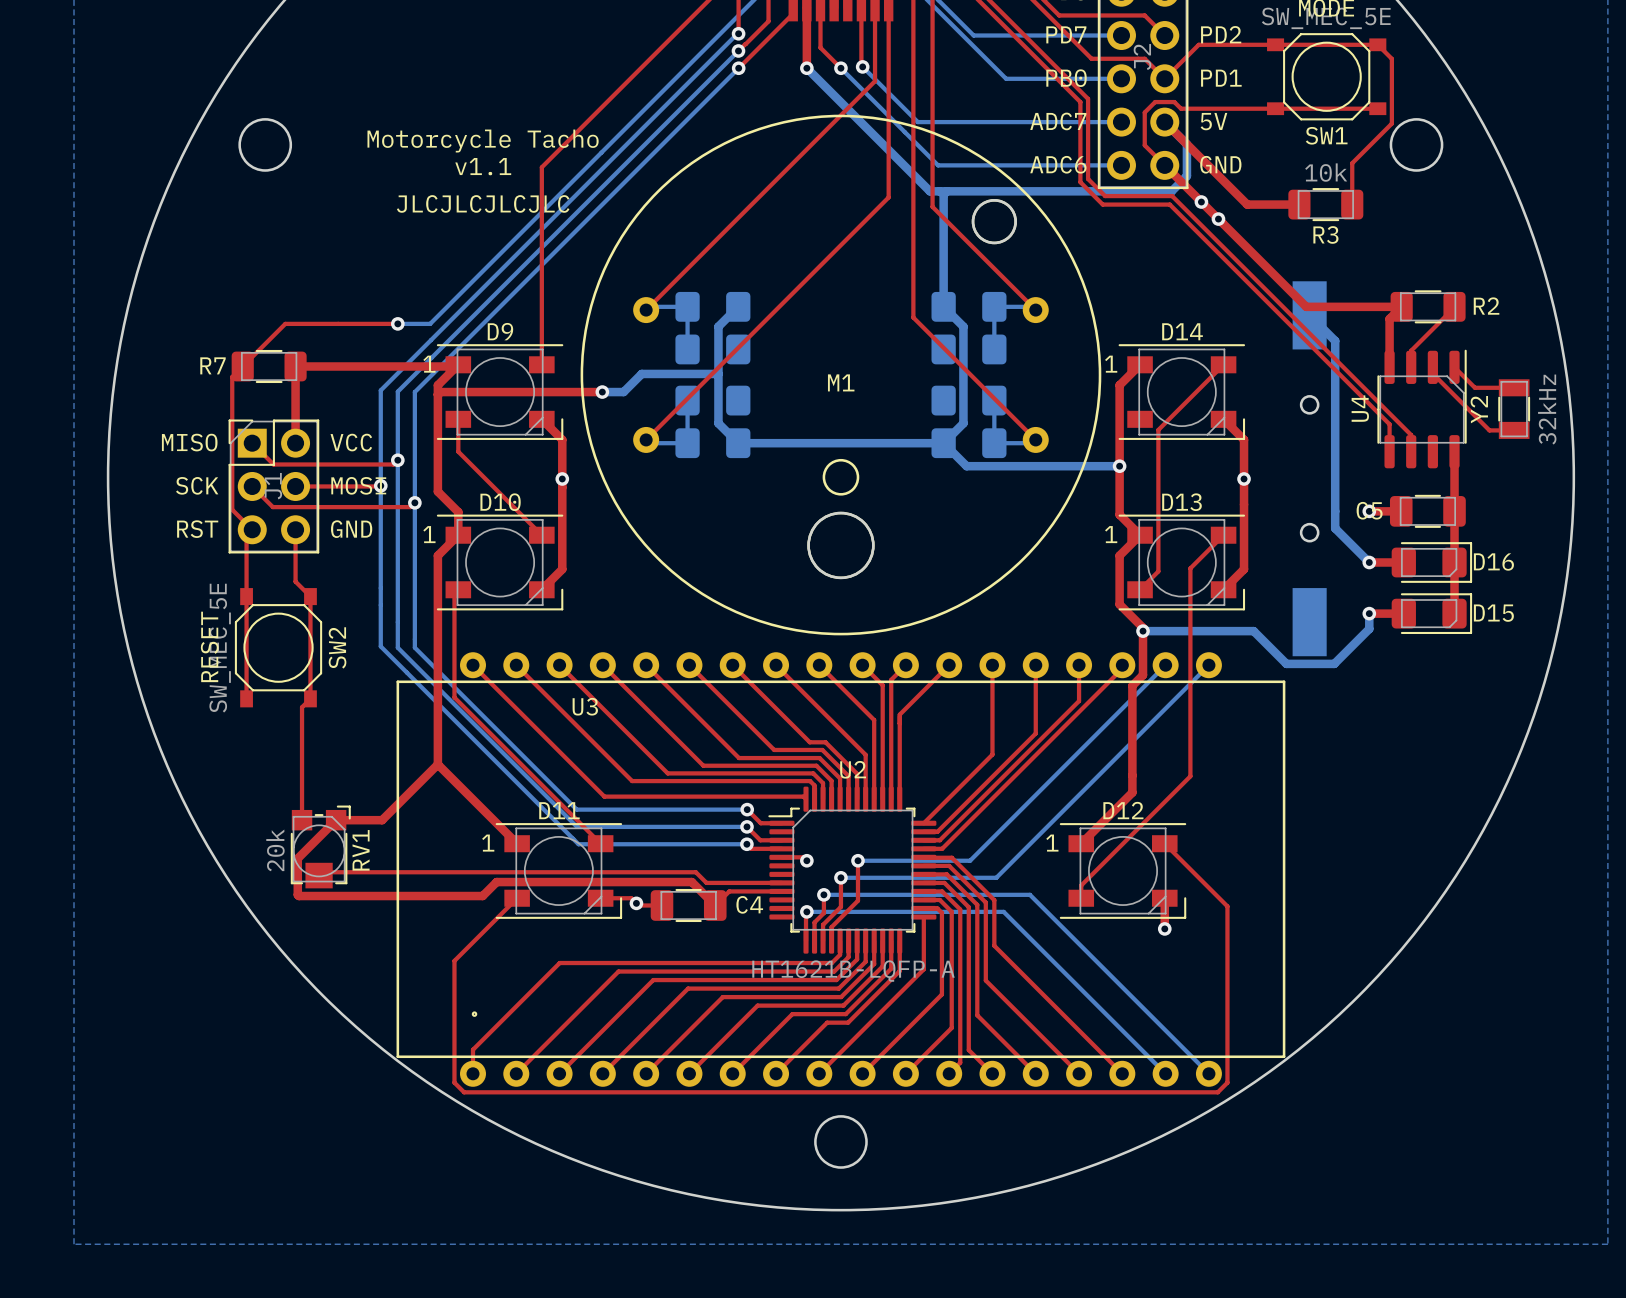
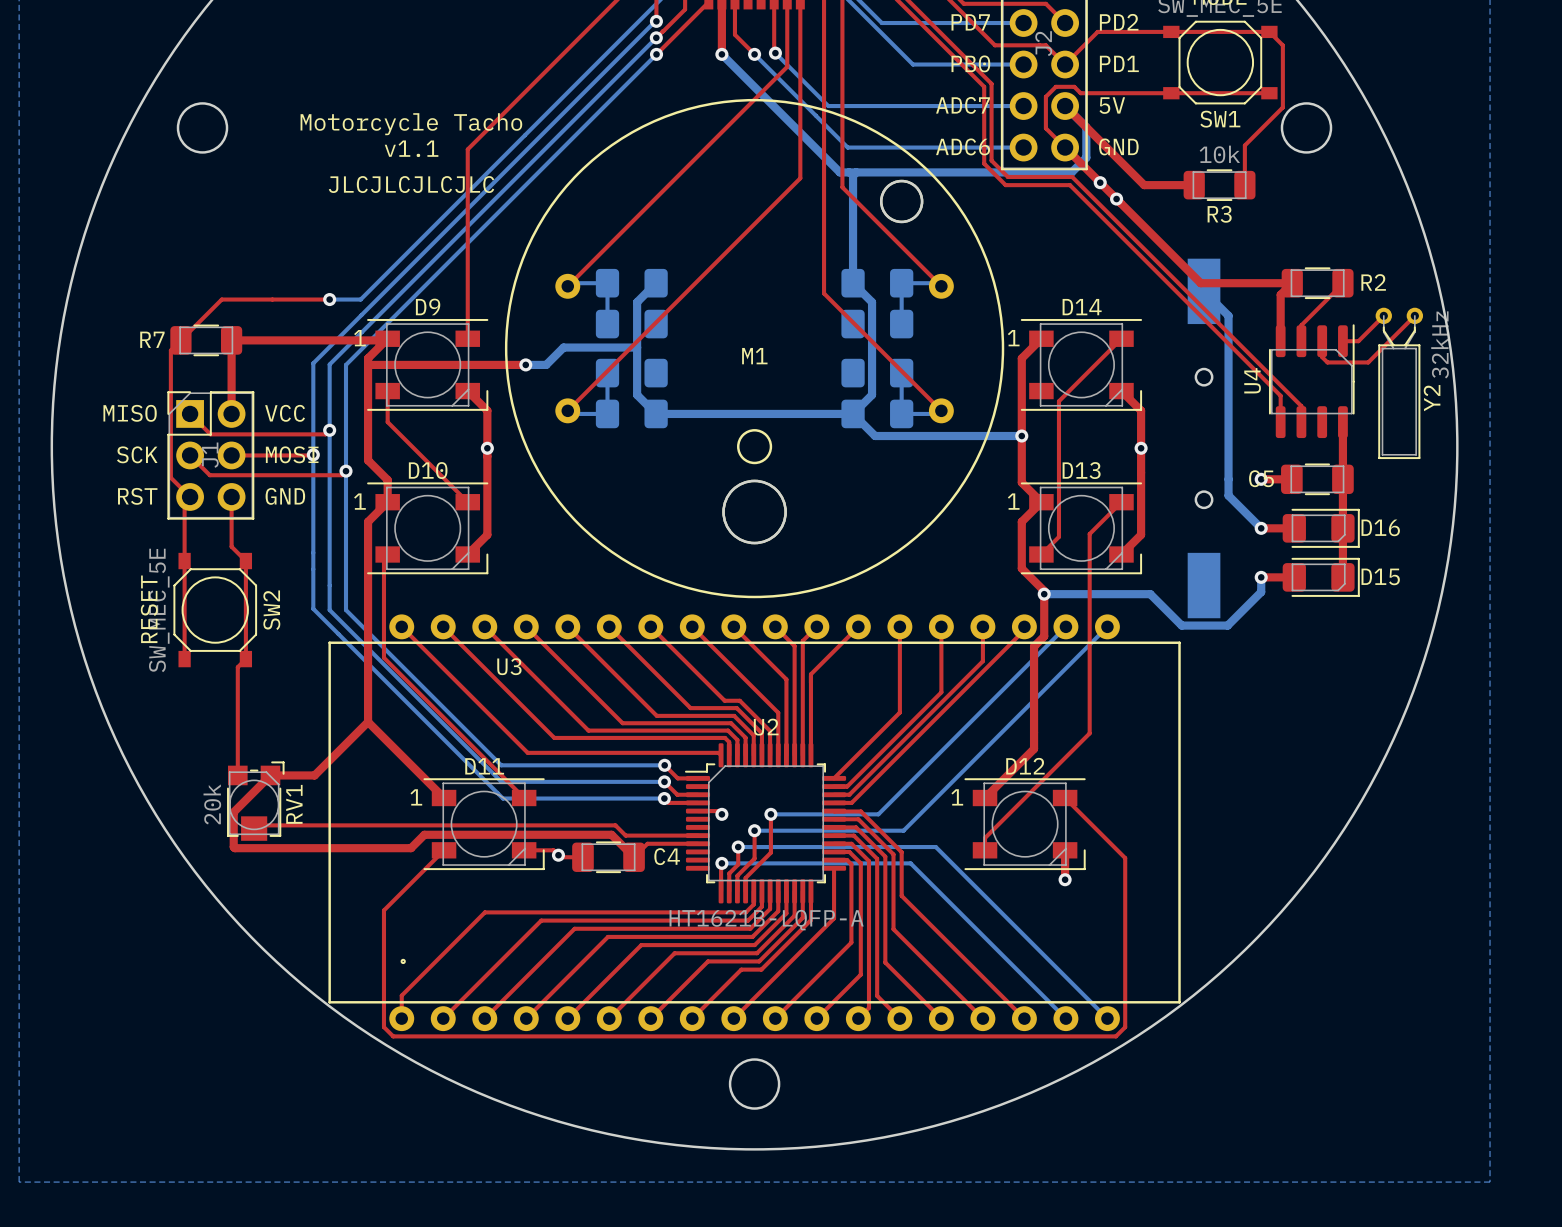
top track: (1454, 367) (1474, 387) (1514, 387) -> (1342, 341) (1358, 341) (1383, 315)
top track: (1432, 373) (1489, 430) (1514, 430) -> (1322, 347) (1322, 357) (1327, 362) (1368, 362) (1414, 315)
Y2 footprint: [1498, 379, 1531, 439] -> [1375, 307, 1424, 460]
Y2 name position: Y2 (1479, 409) -> Y2 (1432, 398)
Y2 value position: 32kHz (1547, 409) -> 32kHz (1440, 344)

